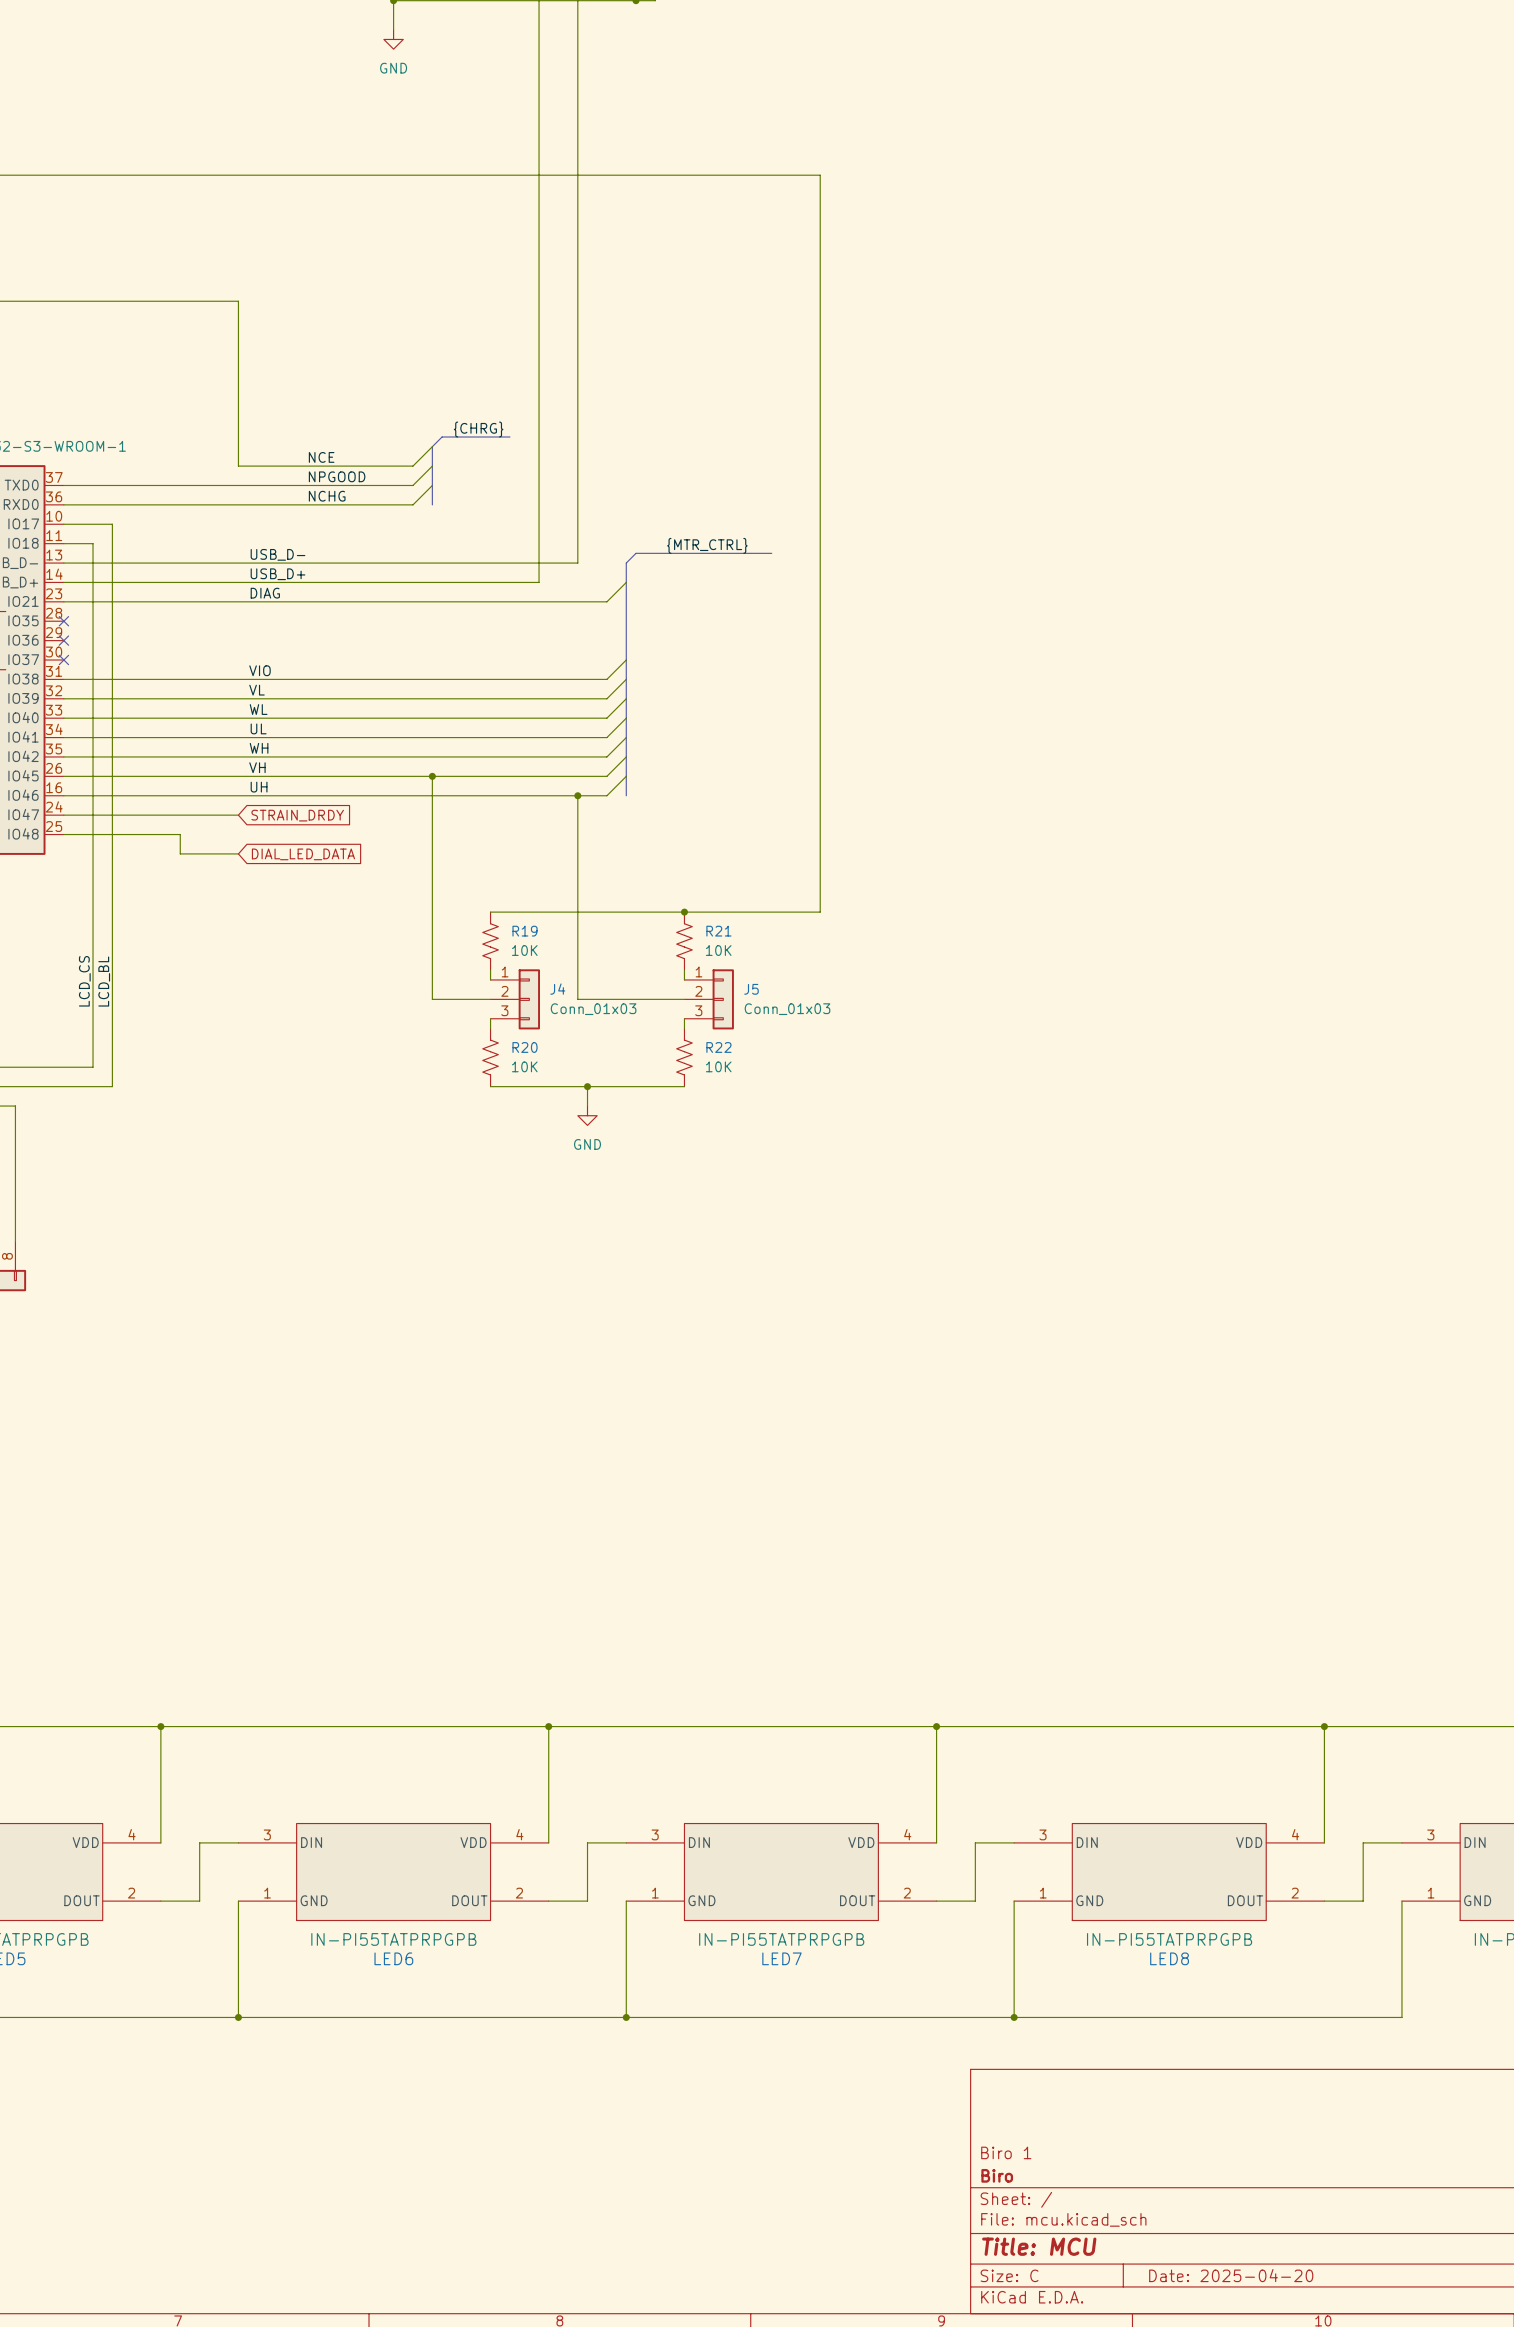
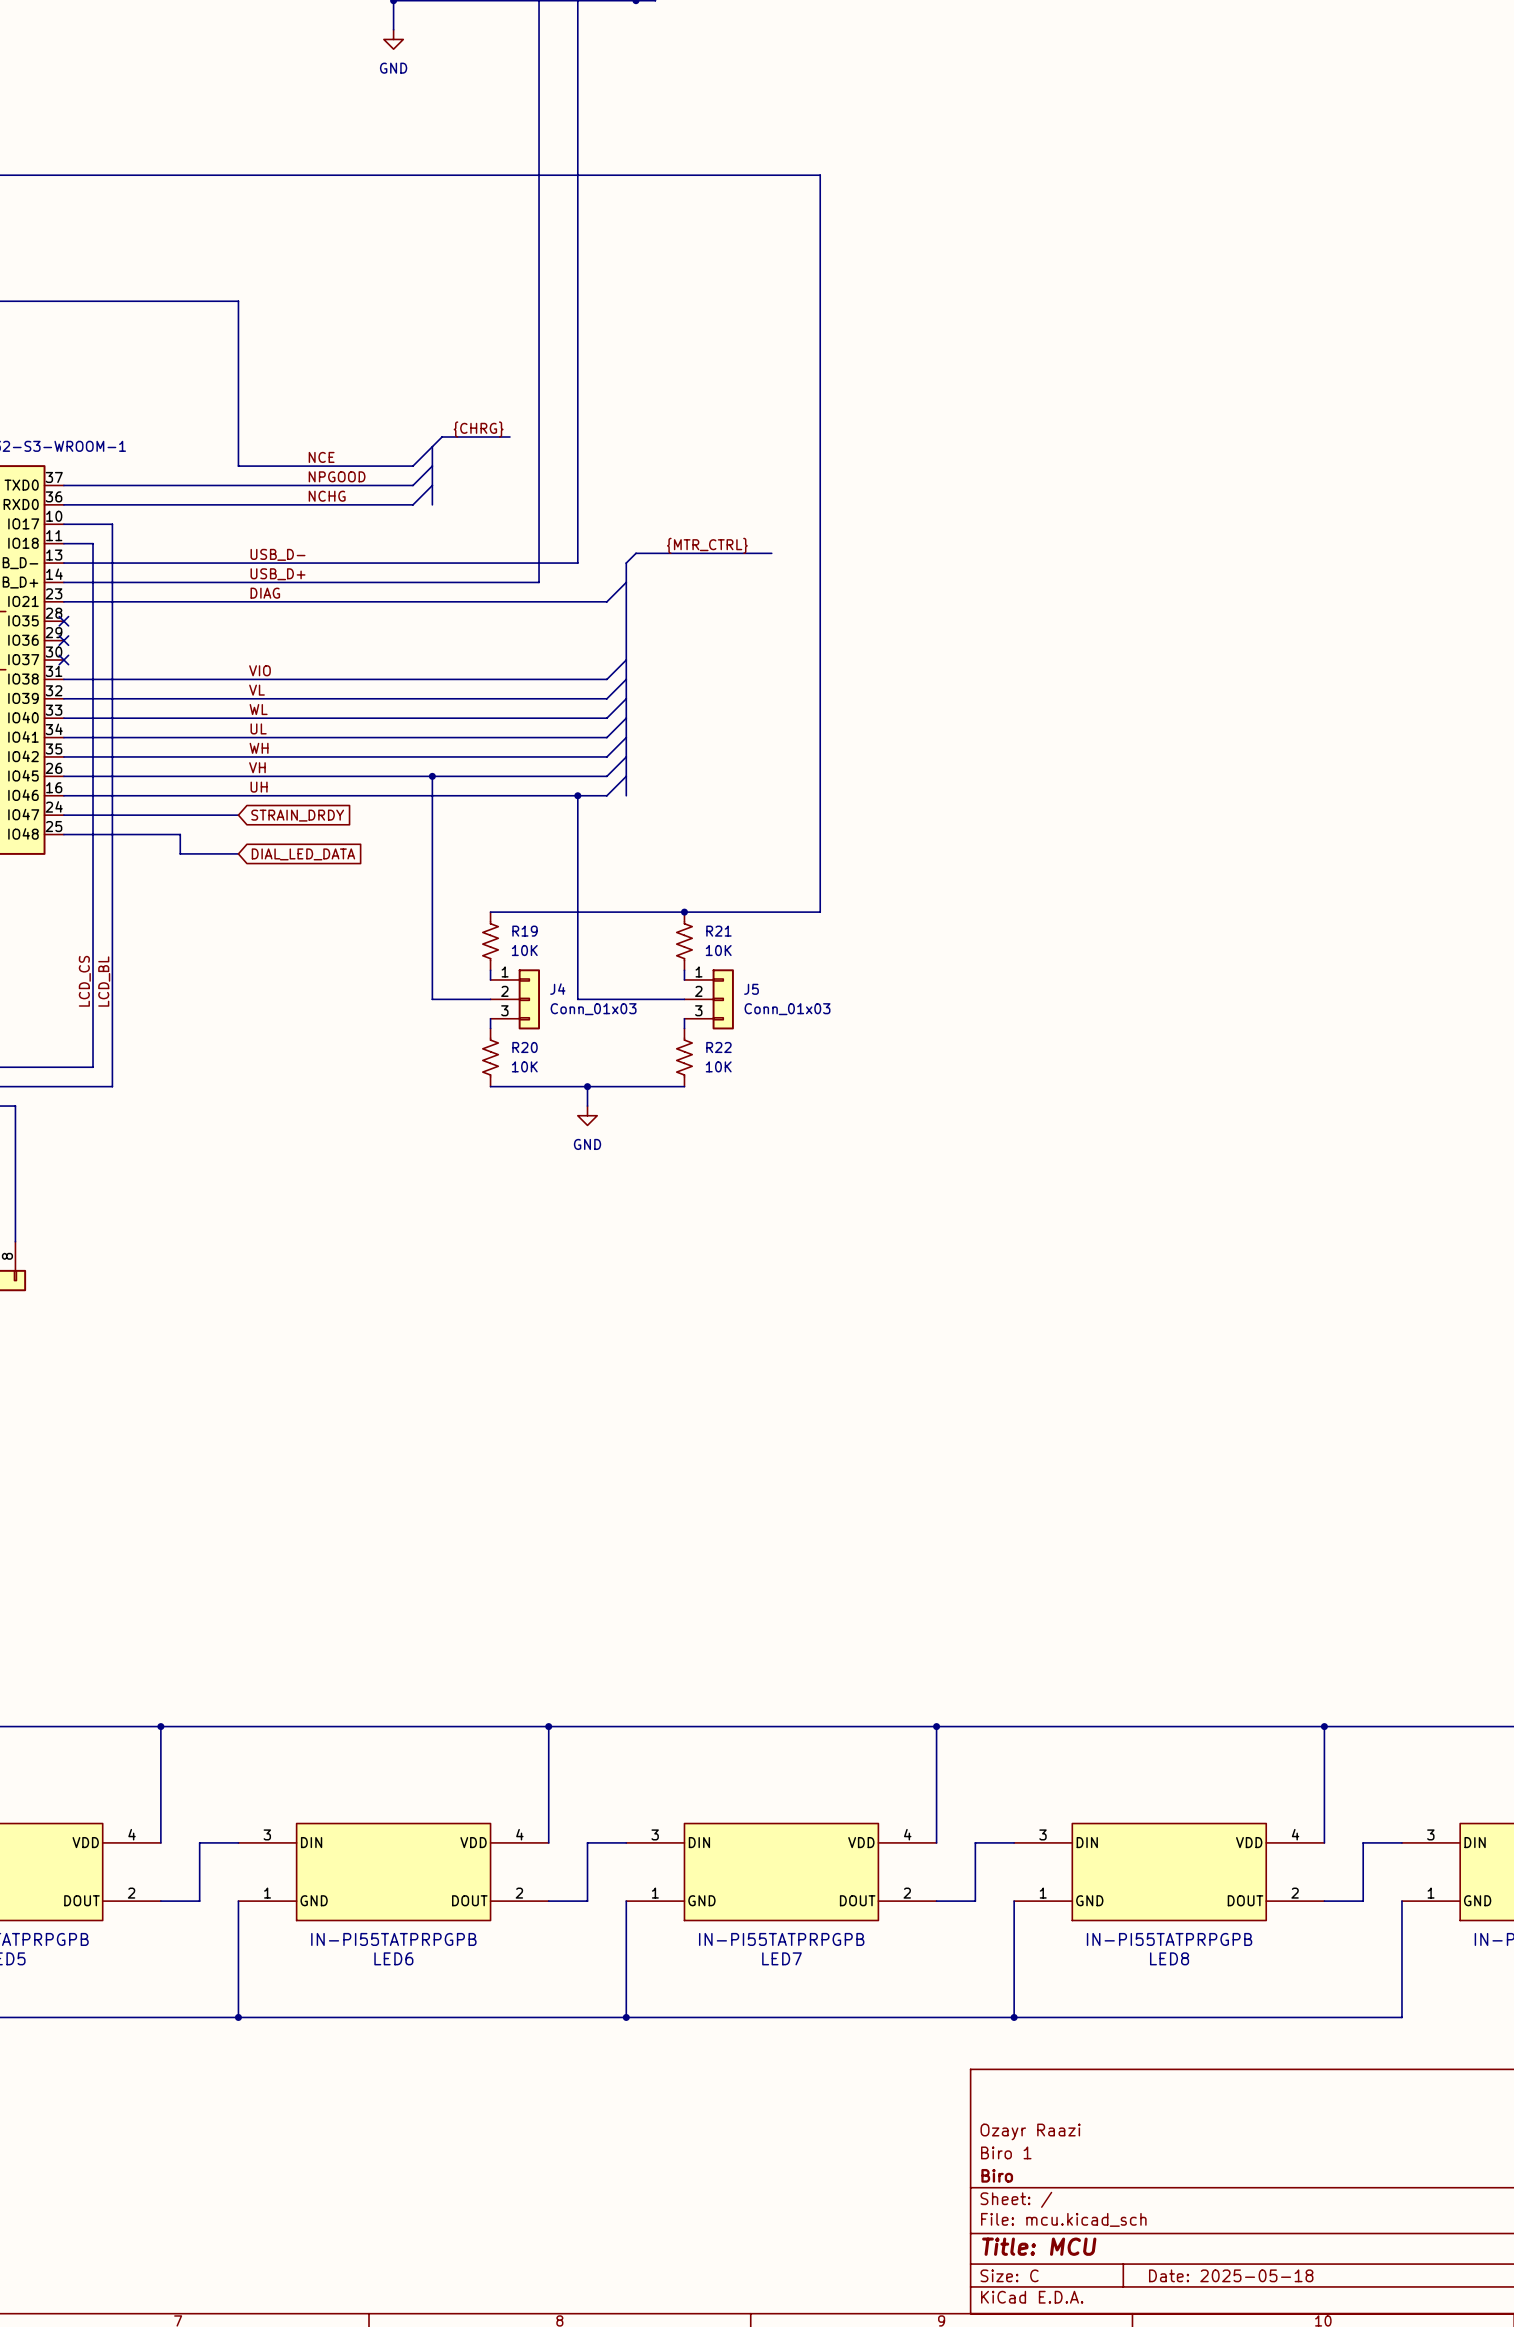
title block: none -> Ozayr Raazi (1030, 2131)
title block: Date: 2025-04-20 (1231, 2275) -> Date: 2025-05-18 (1231, 2275)

